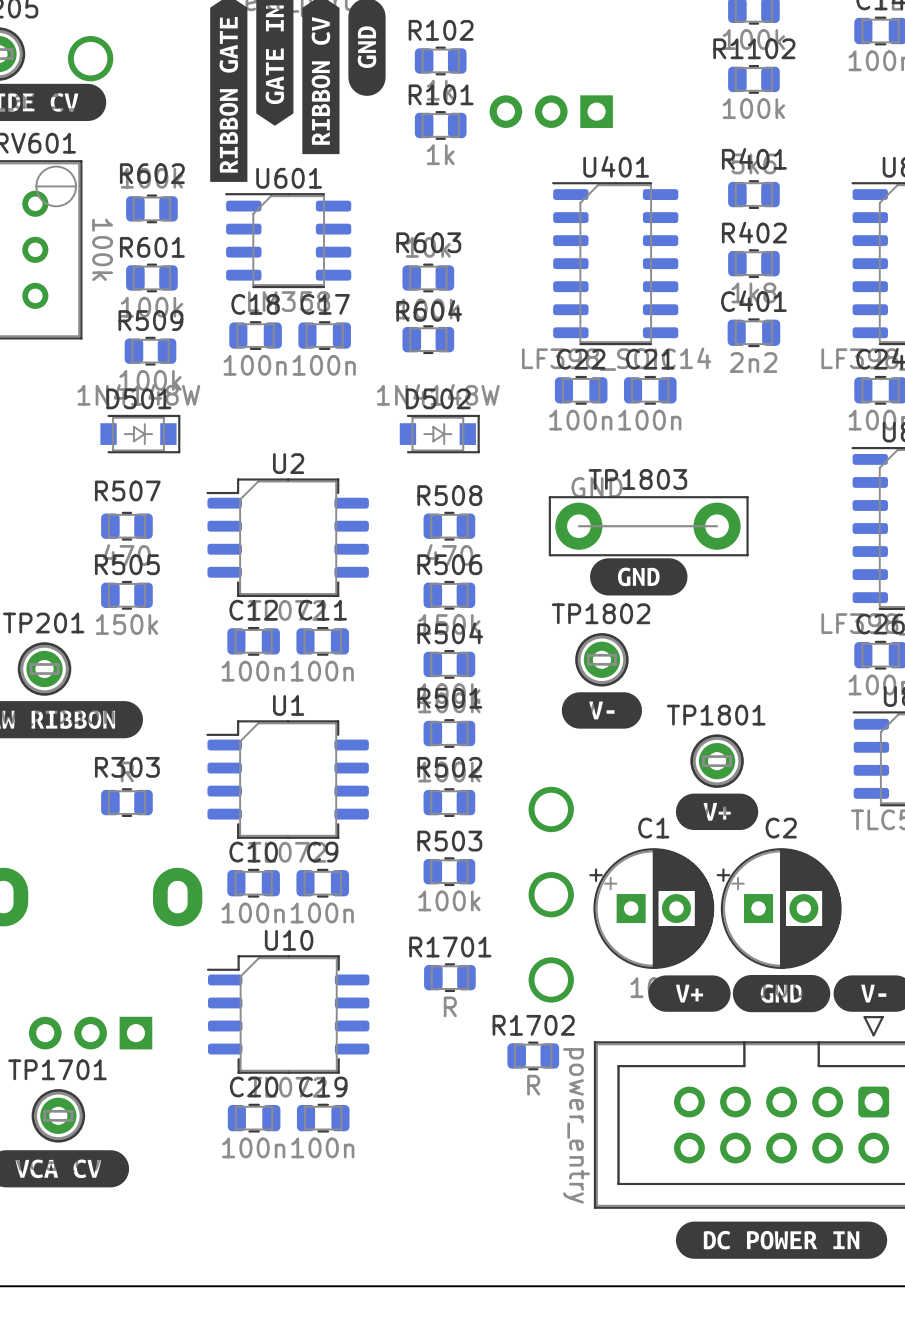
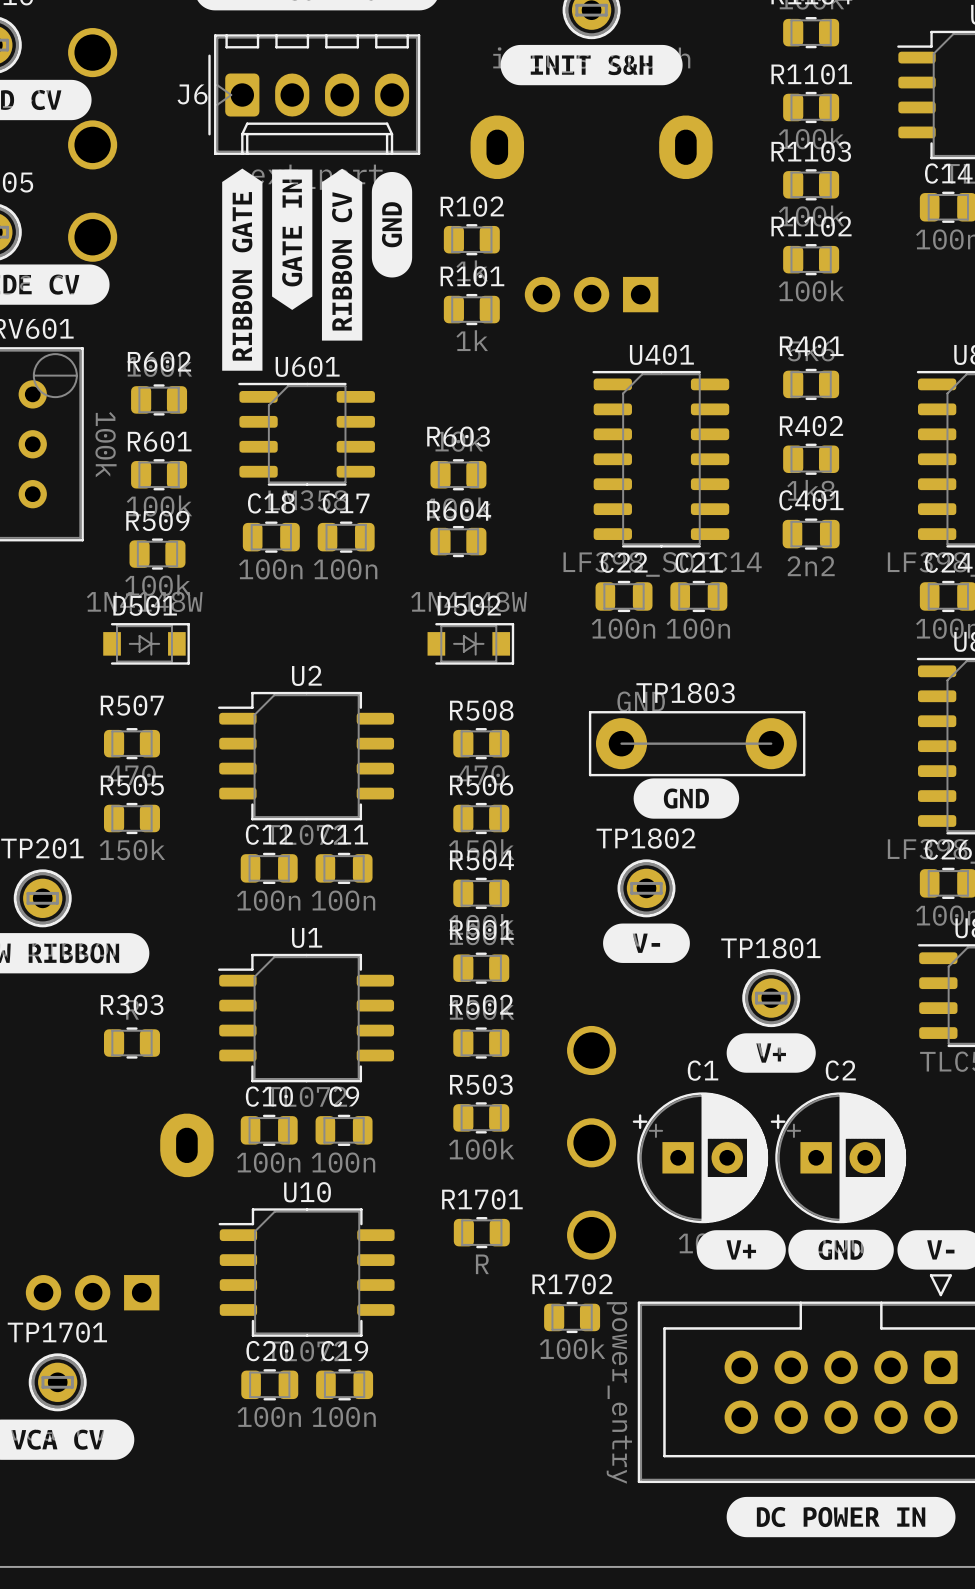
R1702 value: R (533, 1085) -> 100k (572, 1348)

